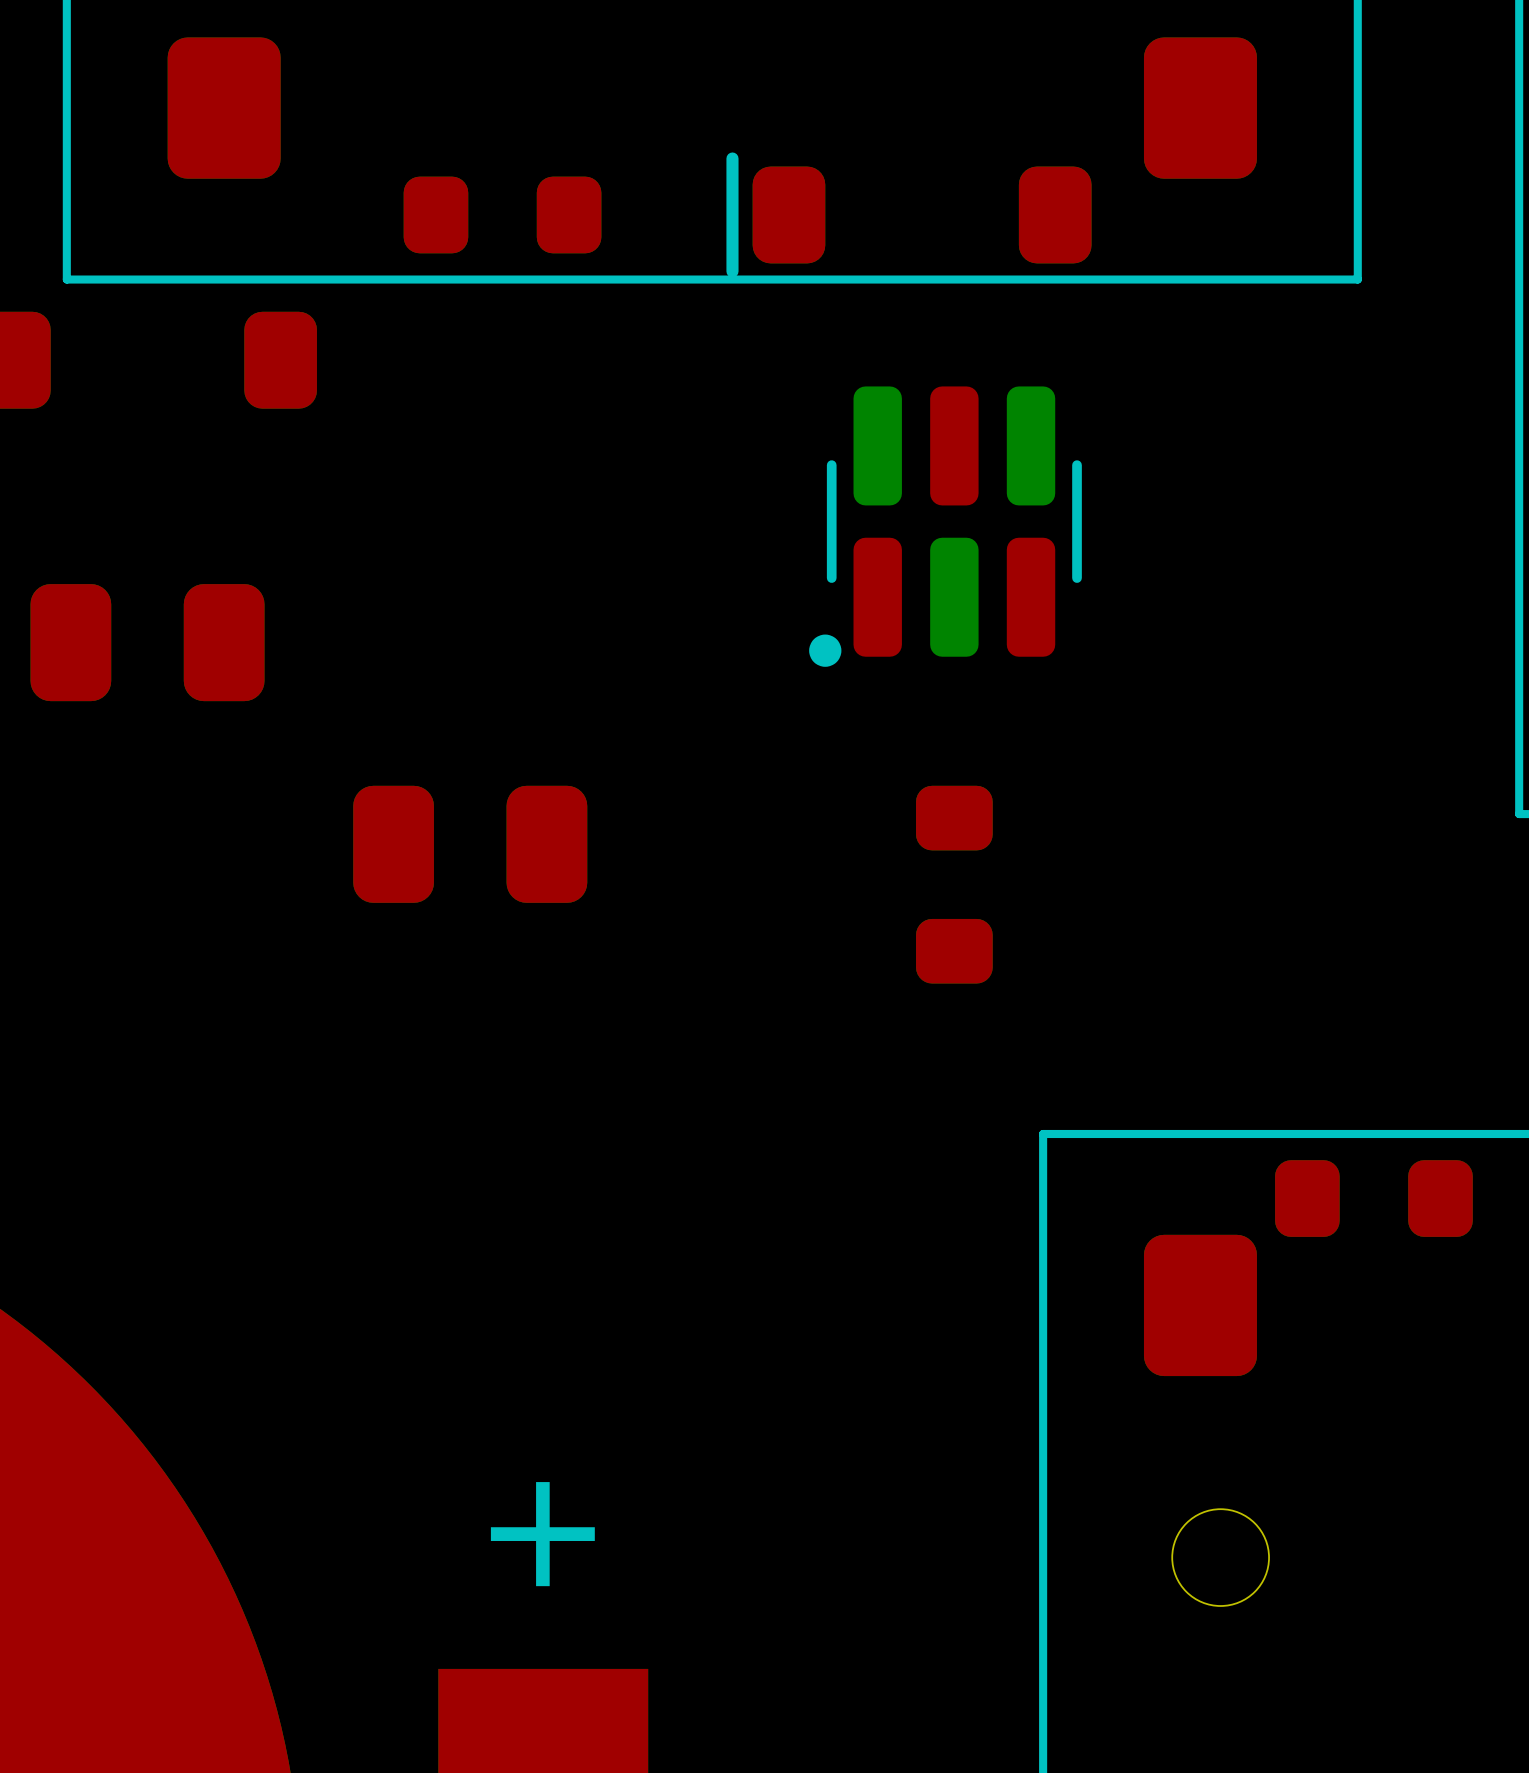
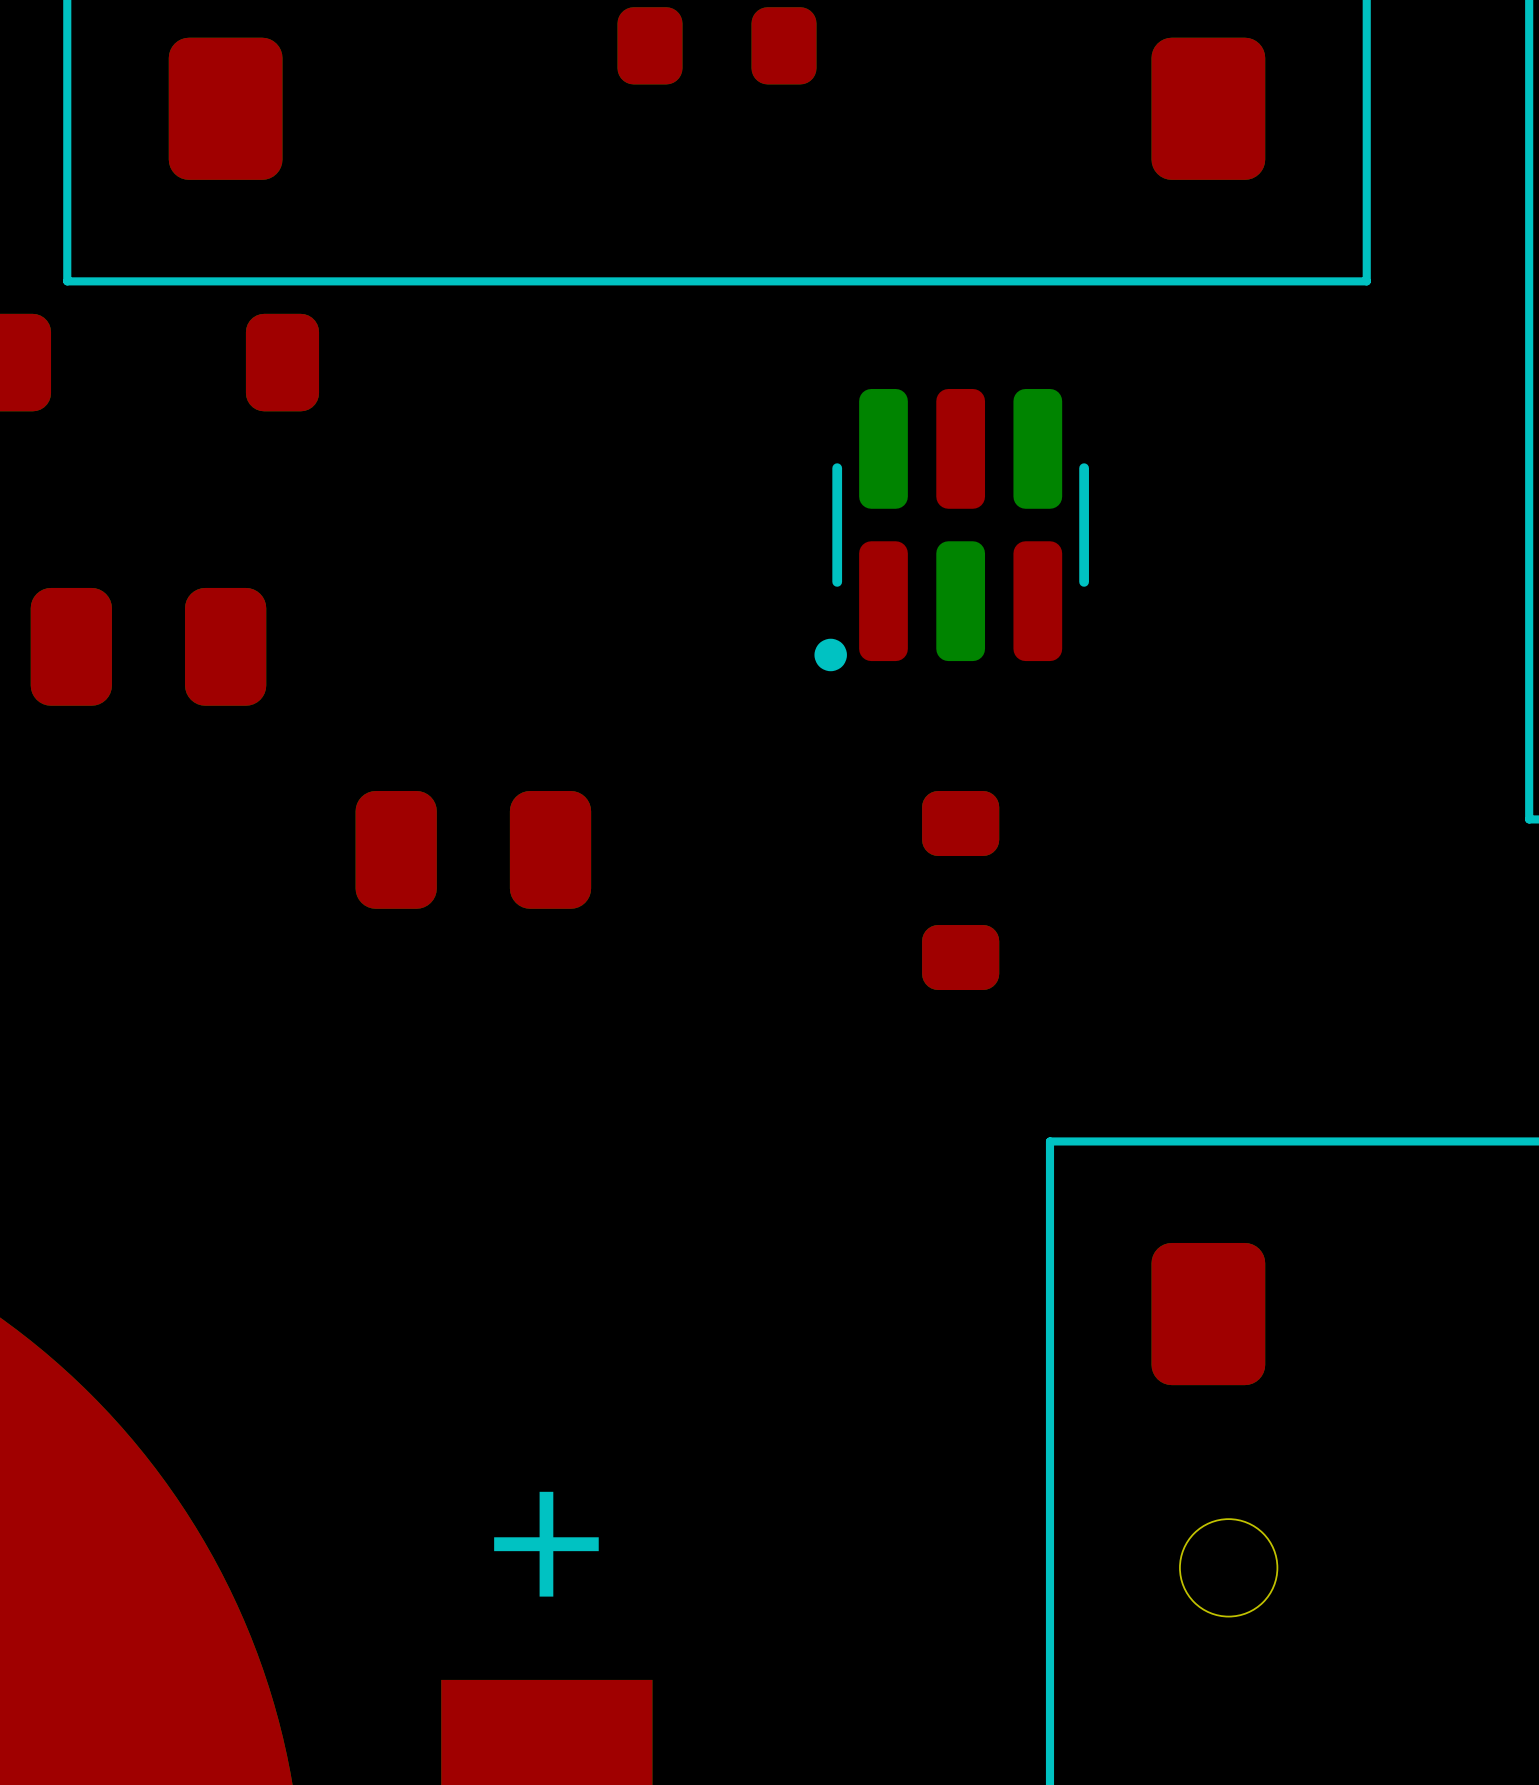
part position: (502, 214) -> (717, 45)
part: (908, 214) -> none
part: (1373, 1198) -> none

